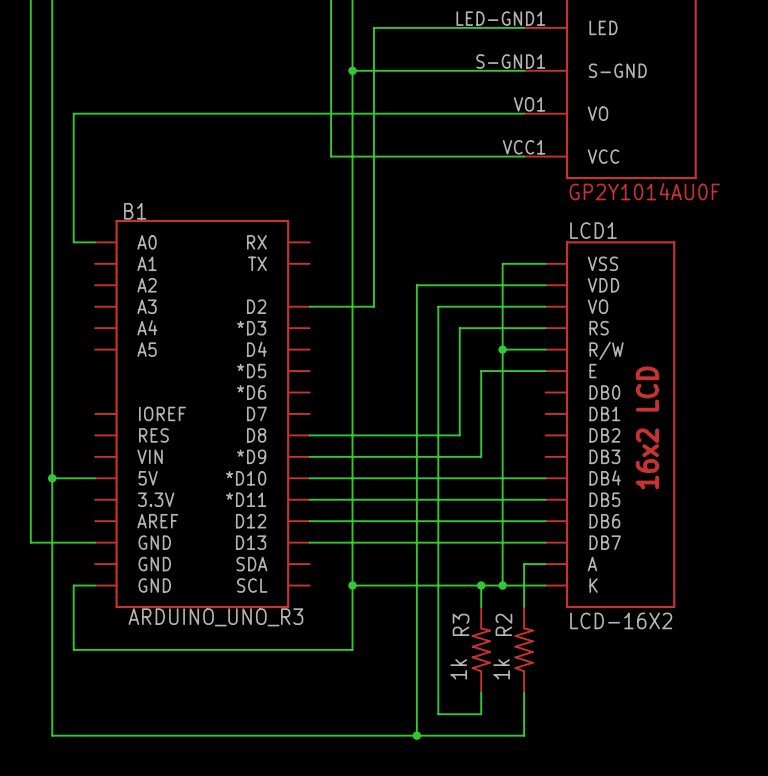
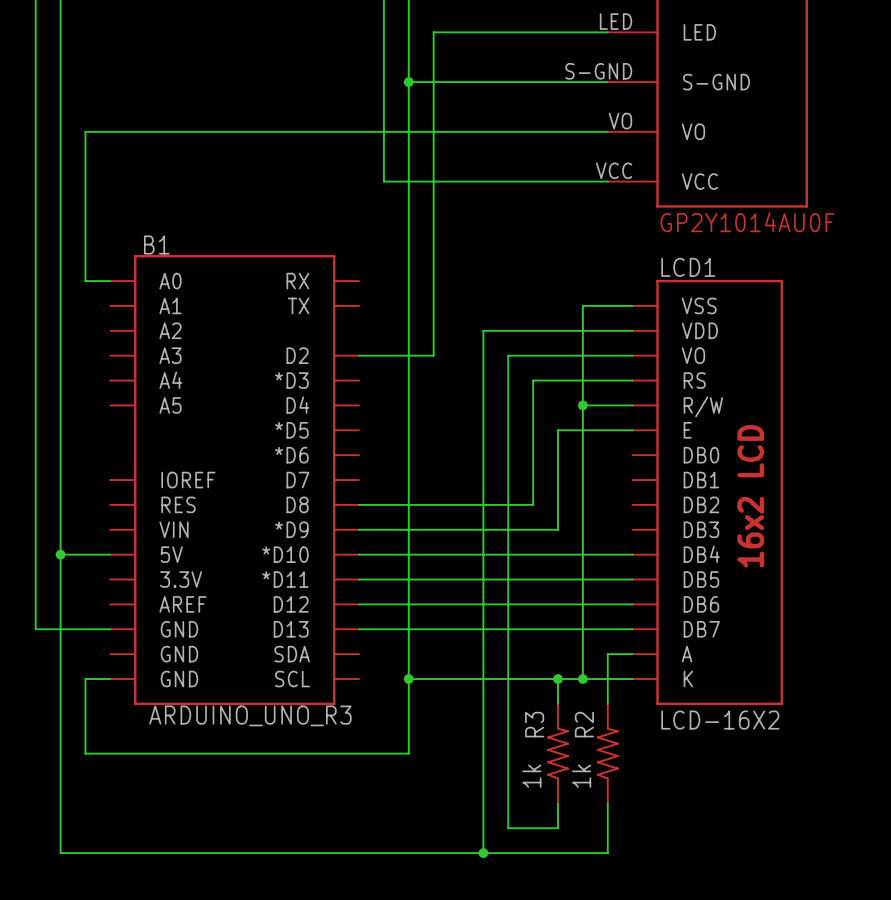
part pin number: LED-GND1 (500, 18) -> LED (616, 21)
part pin number: S-GND1 (510, 61) -> S-GND (598, 71)
part pin number: VO1 (529, 104) -> VO (620, 121)
part pin number: VCC1 (524, 147) -> VCC (614, 170)

